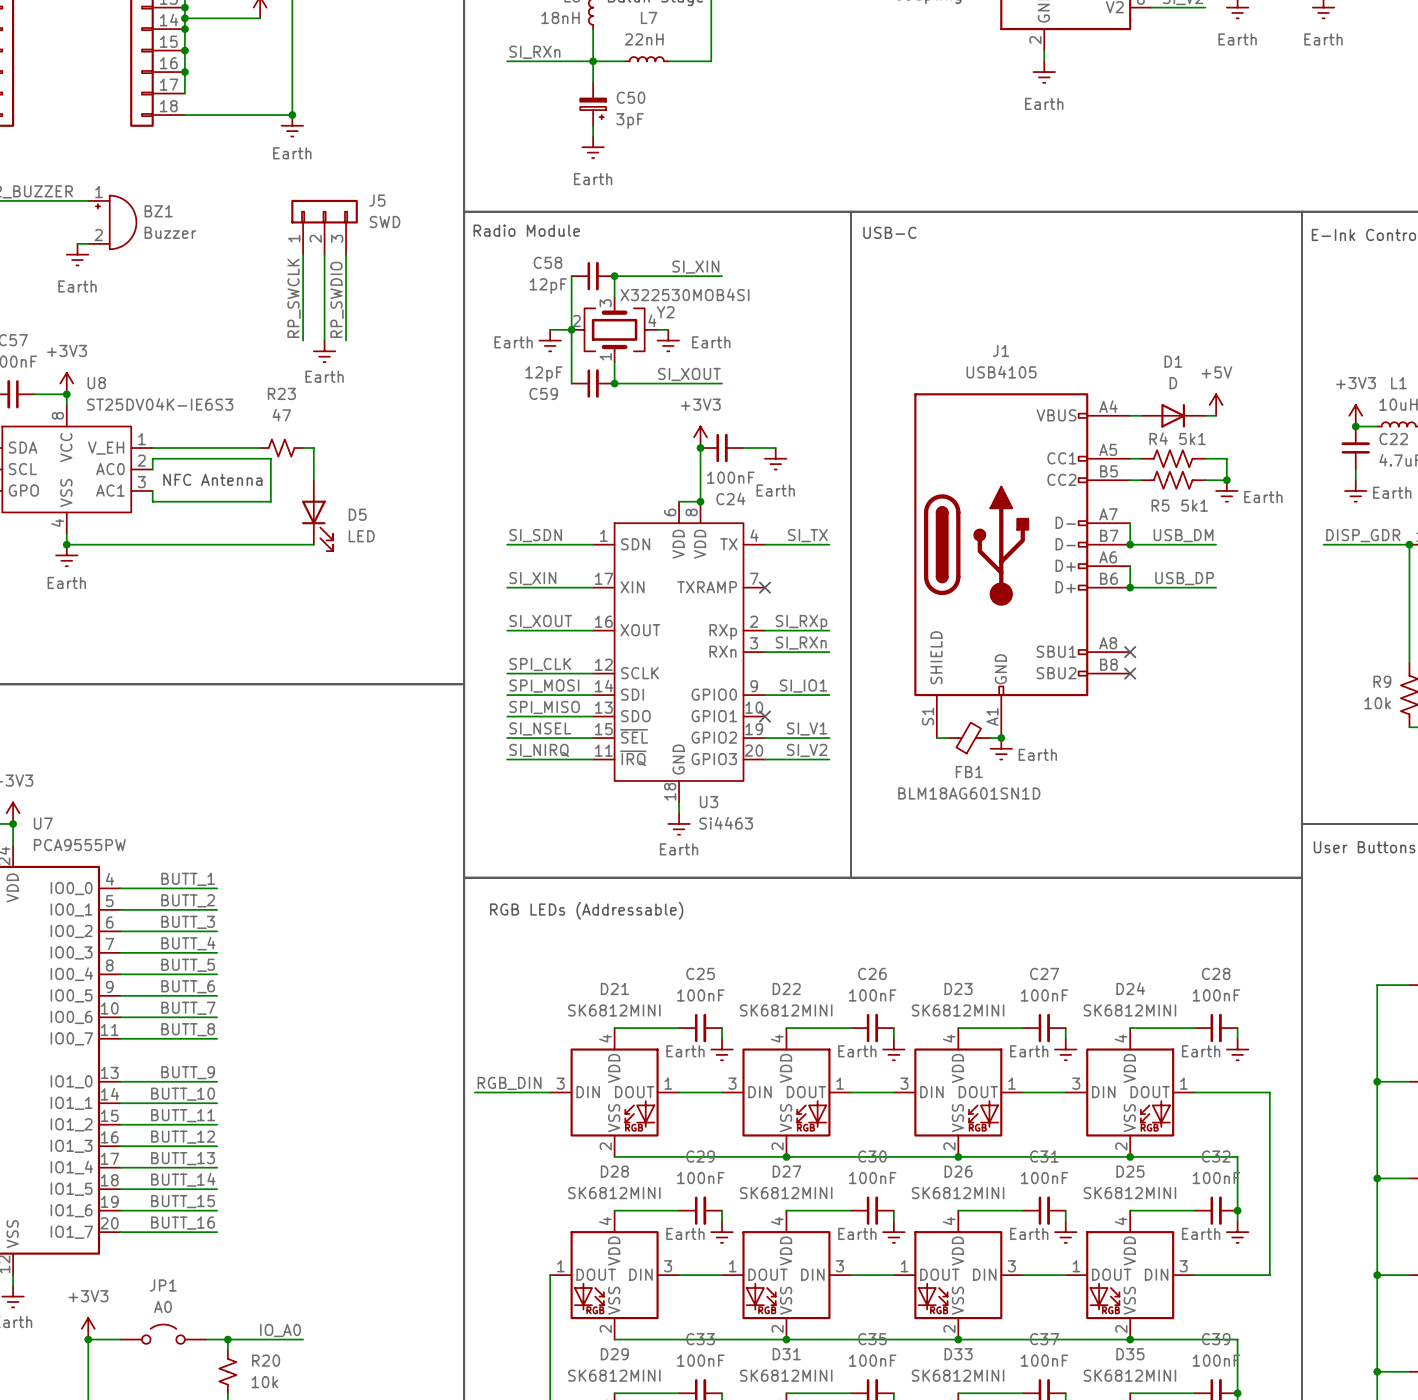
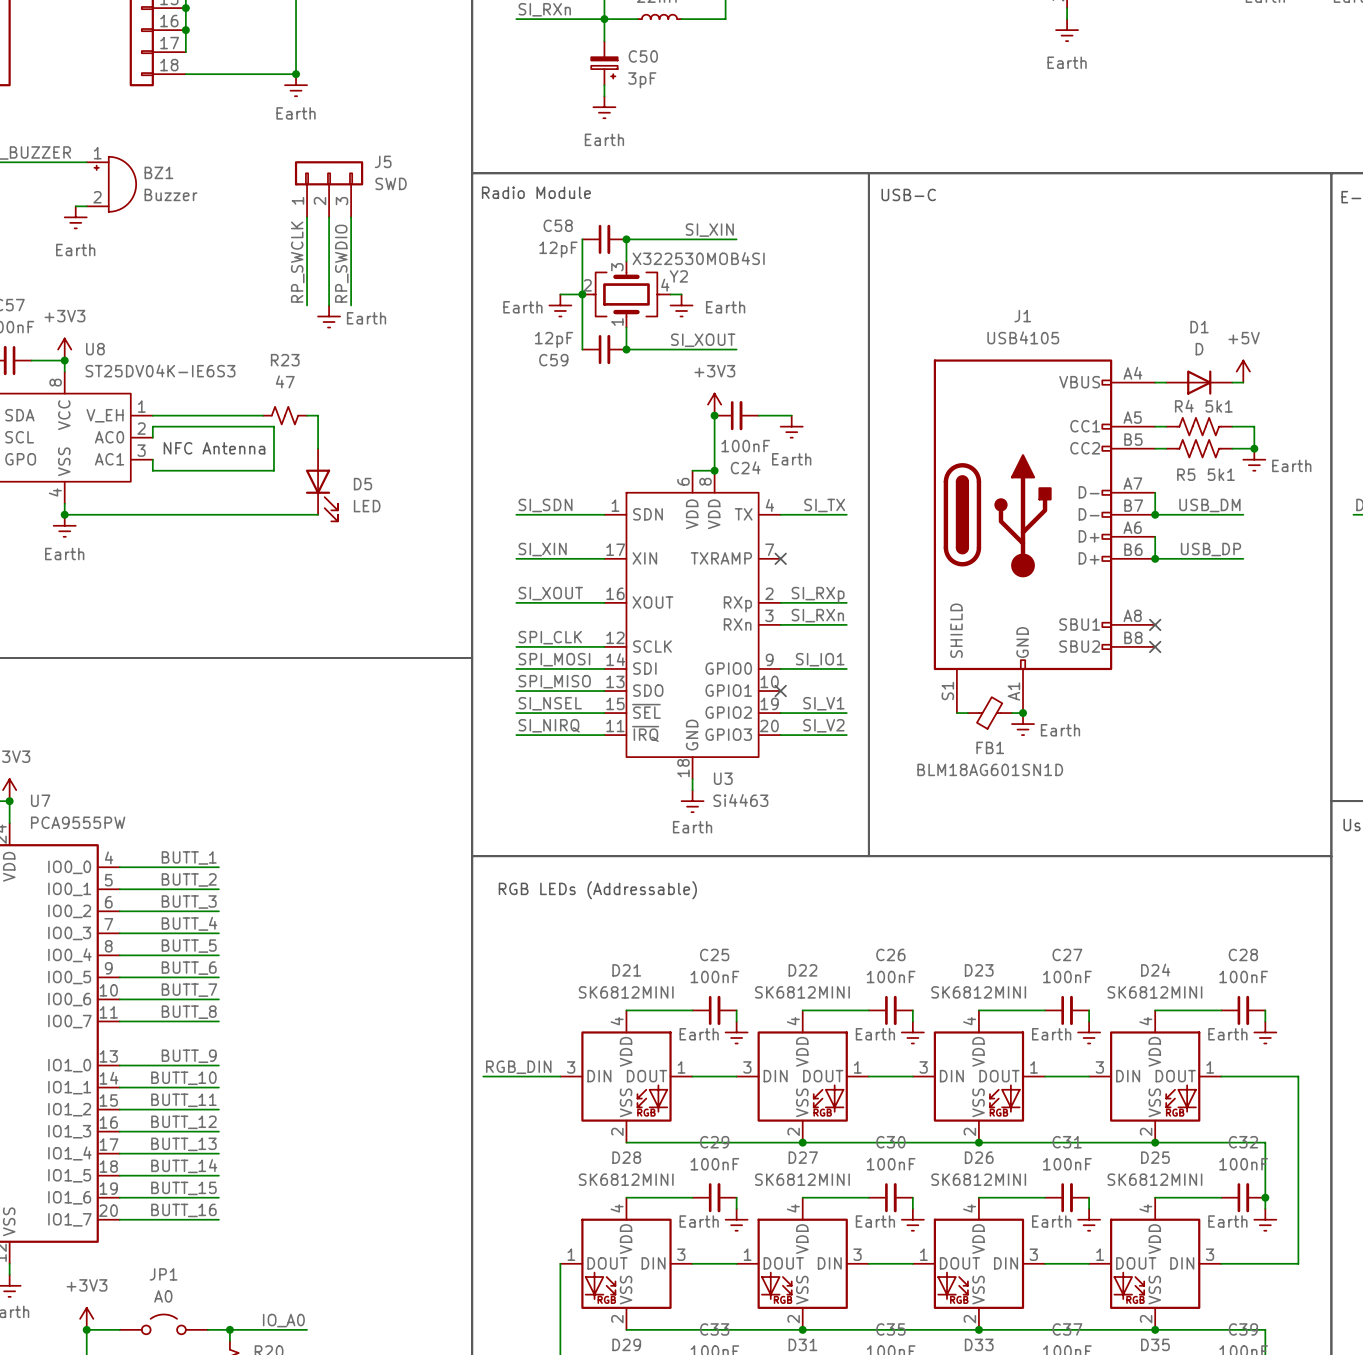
power symbol text position: Earth (324, 376) -> Earth (366, 318)

